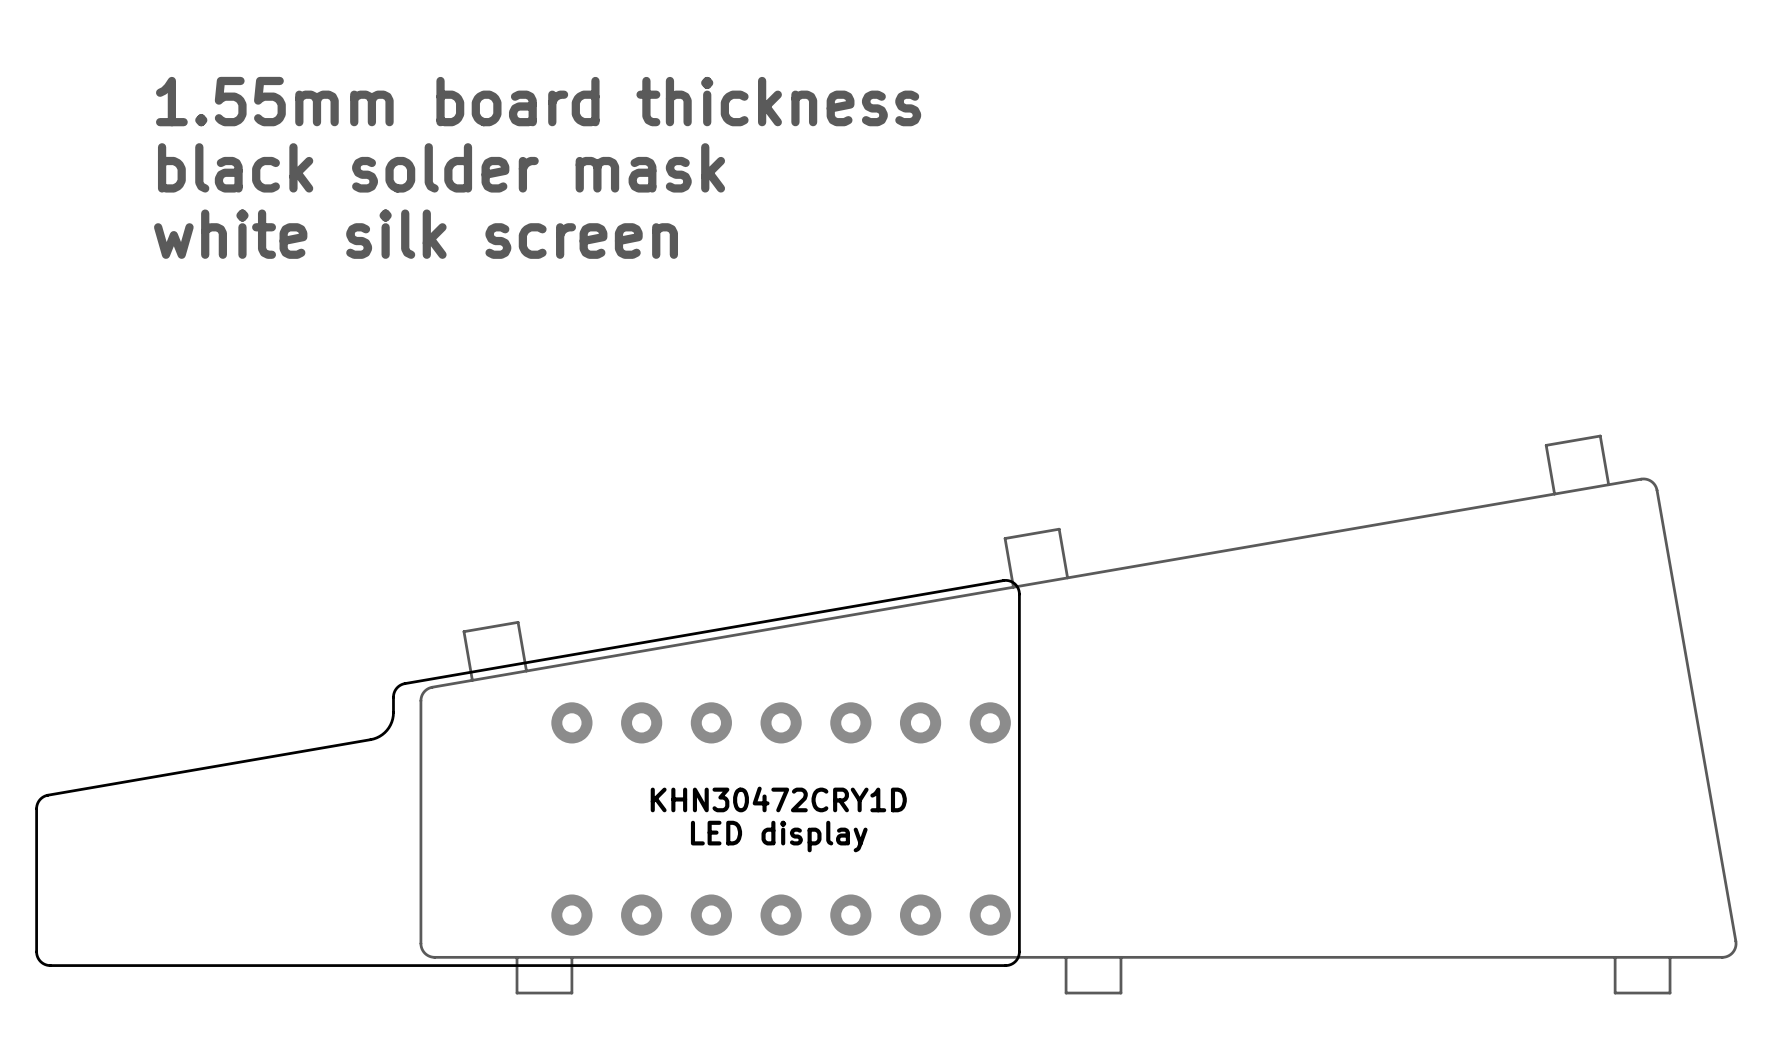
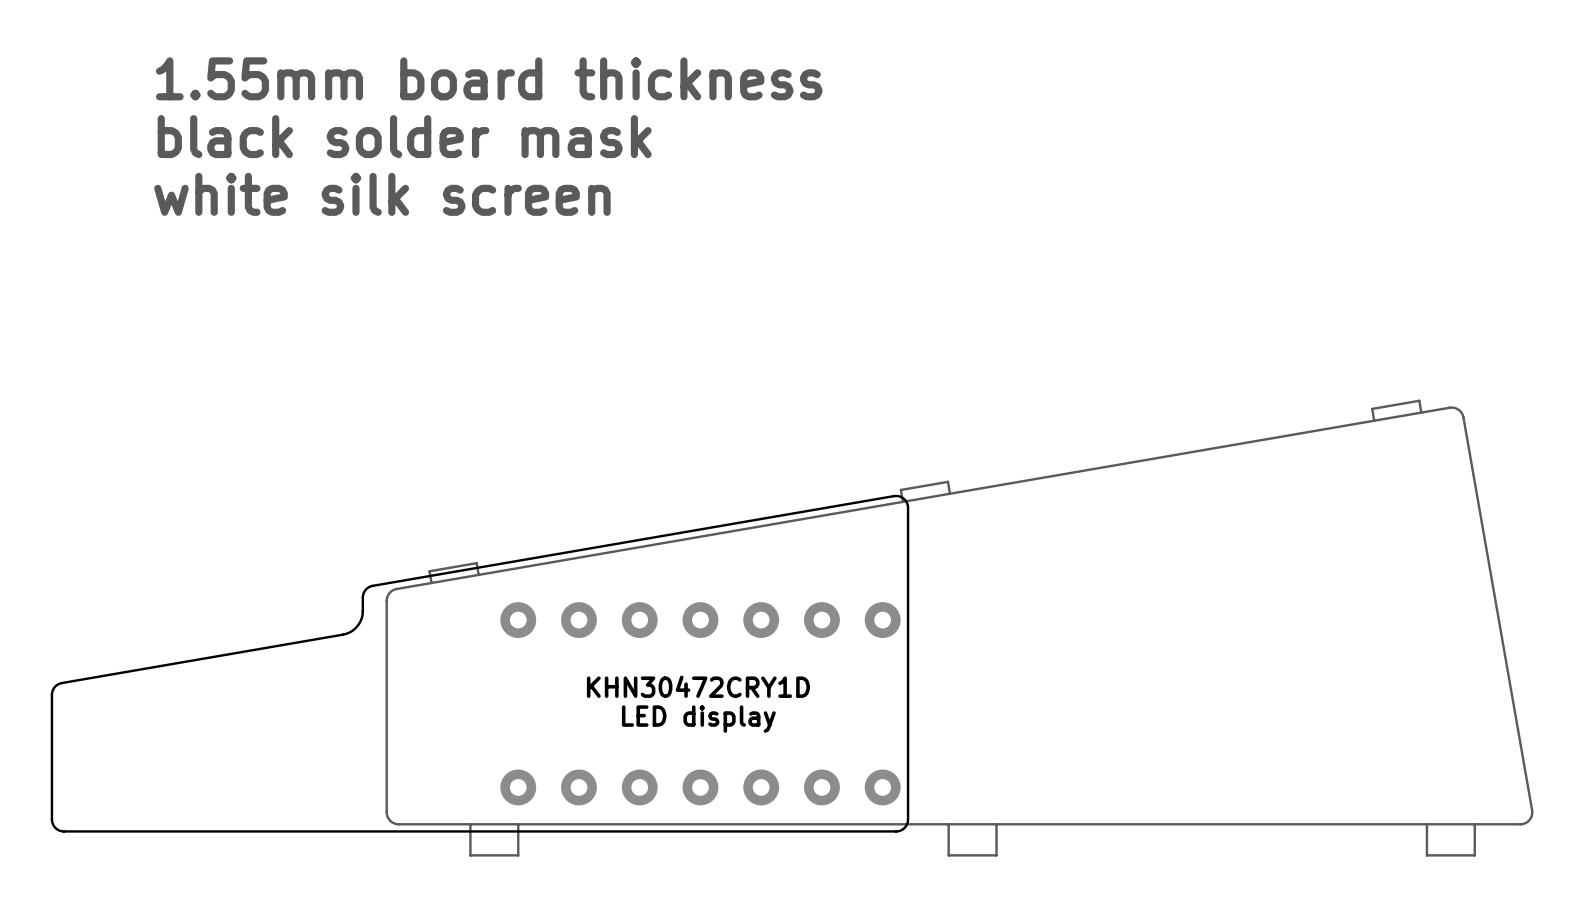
part footprint: [419, 434, 1738, 995] -> [385, 399, 1534, 857]

